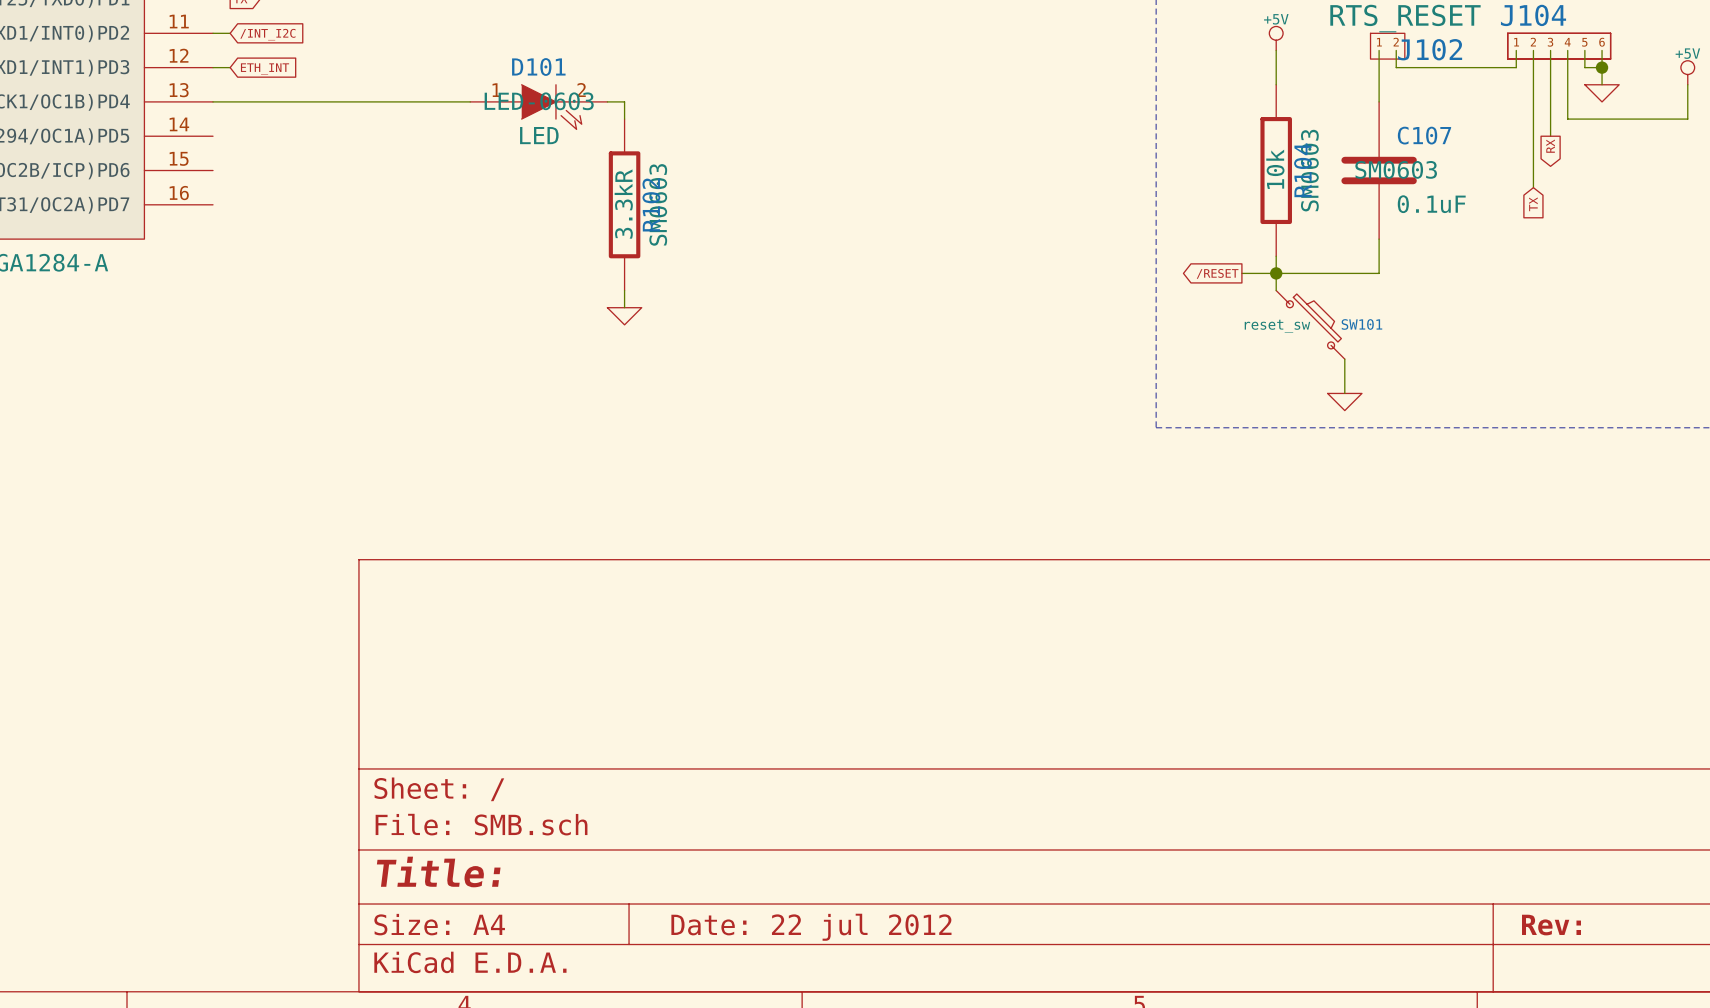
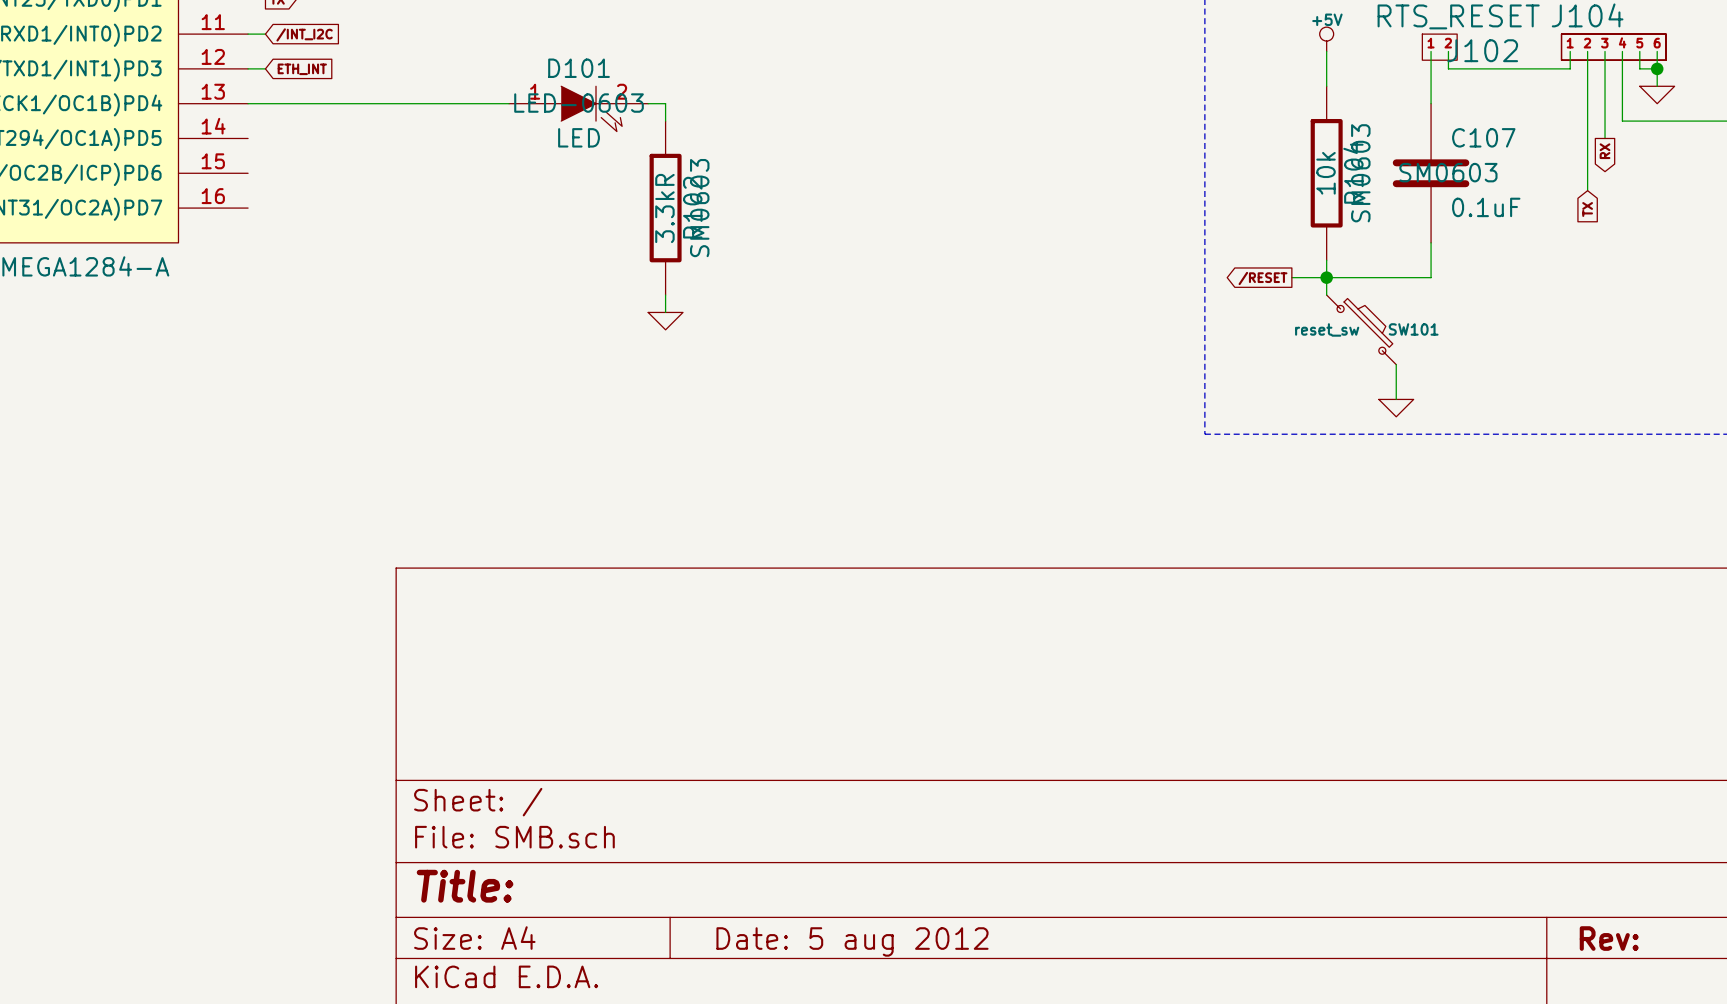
title block: Date: 22 jul 2012 (811, 927) -> Date: 5 aug 2012 (852, 941)

